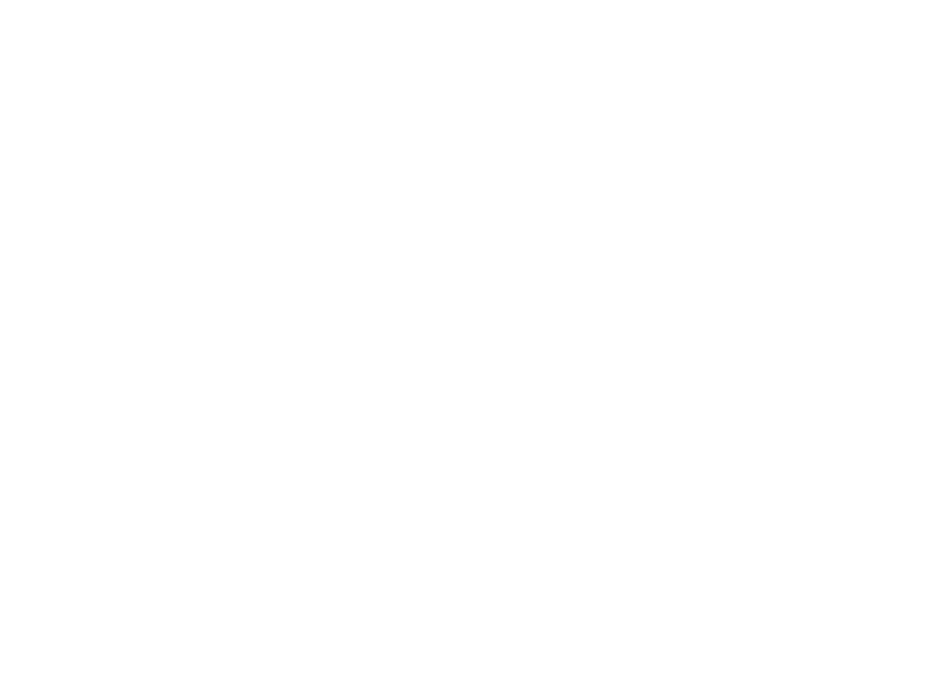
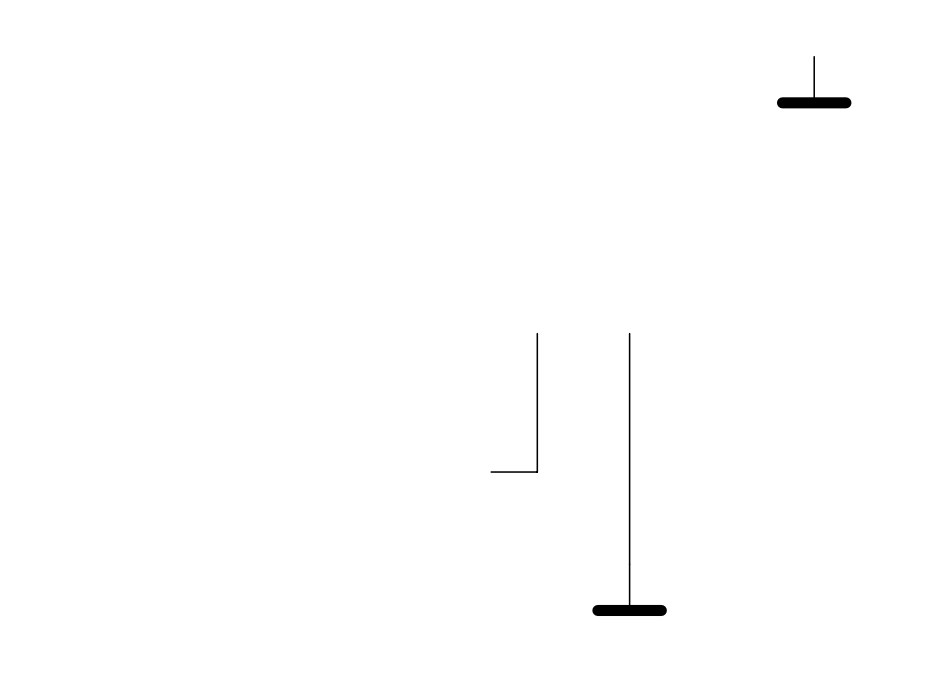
power symbol: none -> (814, 82)
wire: none -> (537, 333) (537, 472) (491, 472)
wire: none -> (629, 333) (629, 564)
power symbol: none -> (629, 590)

